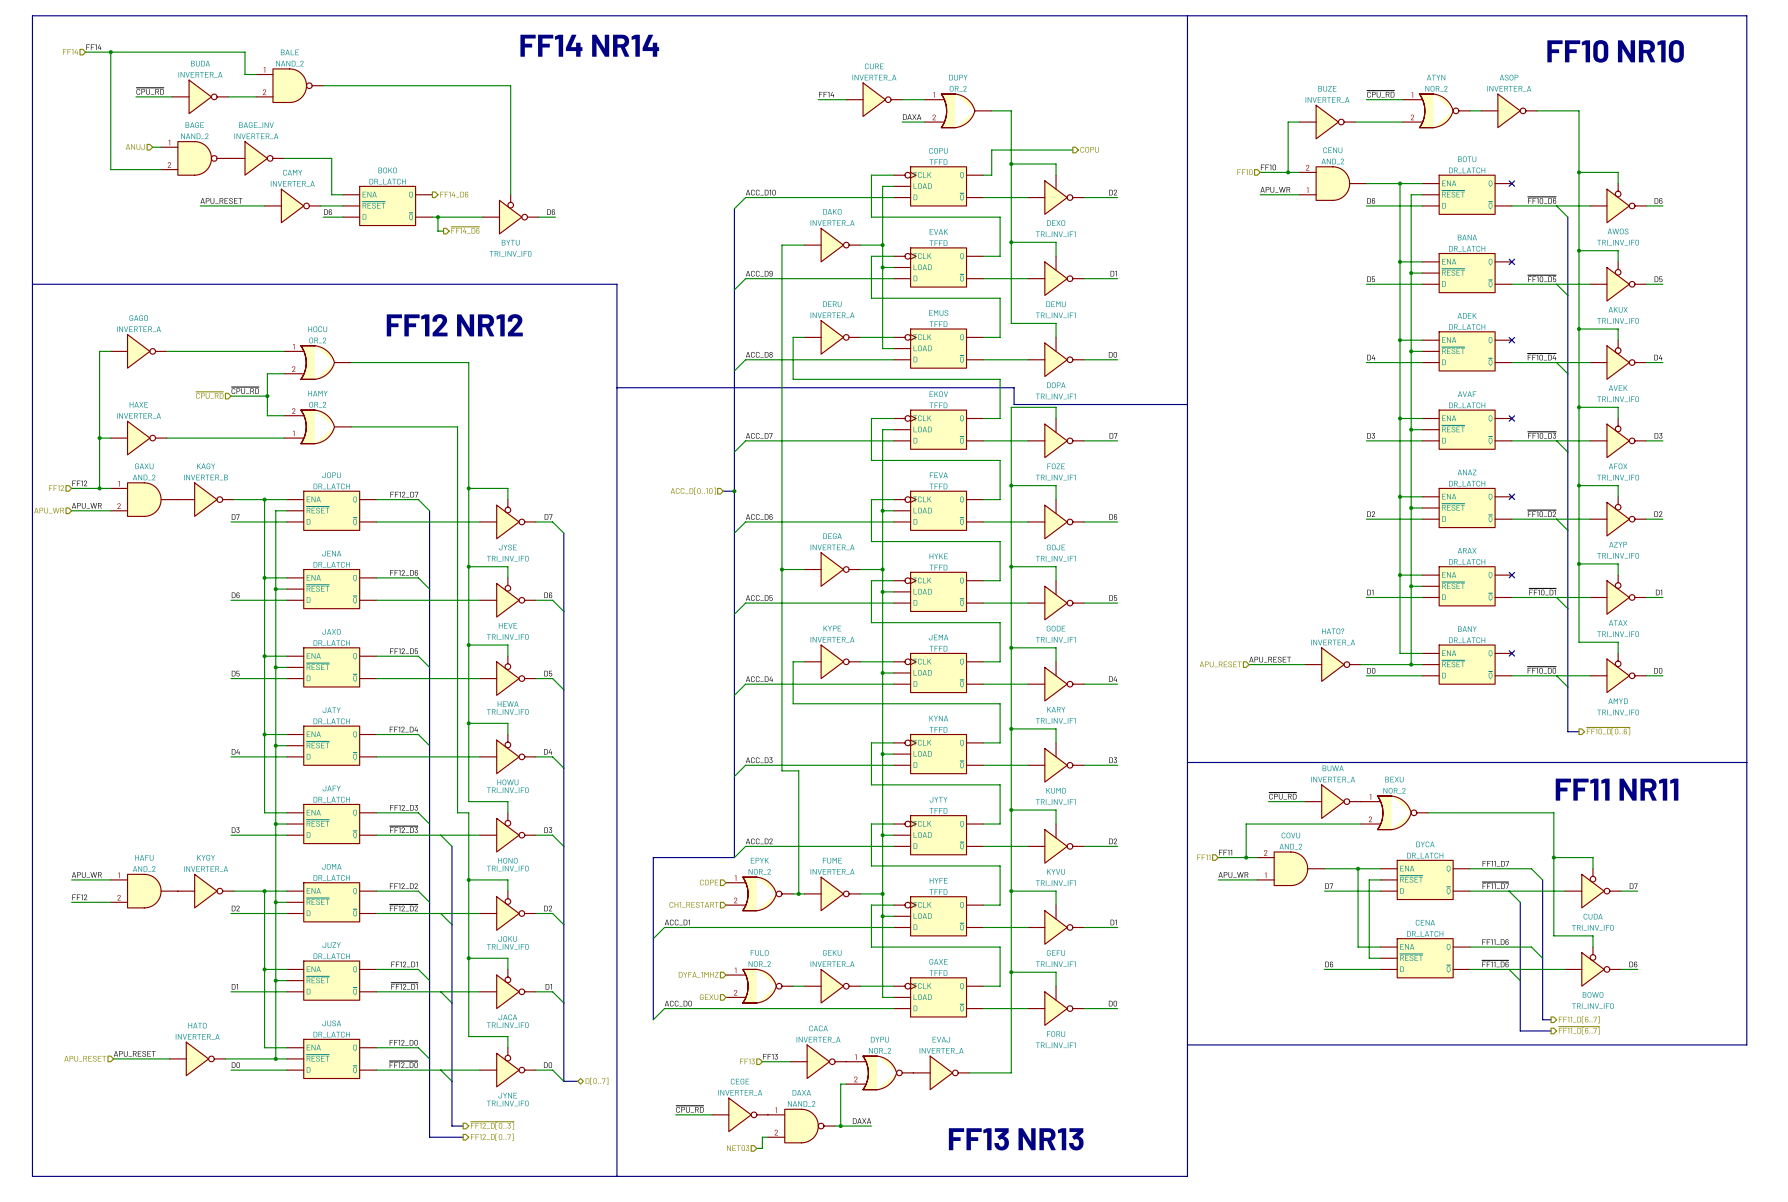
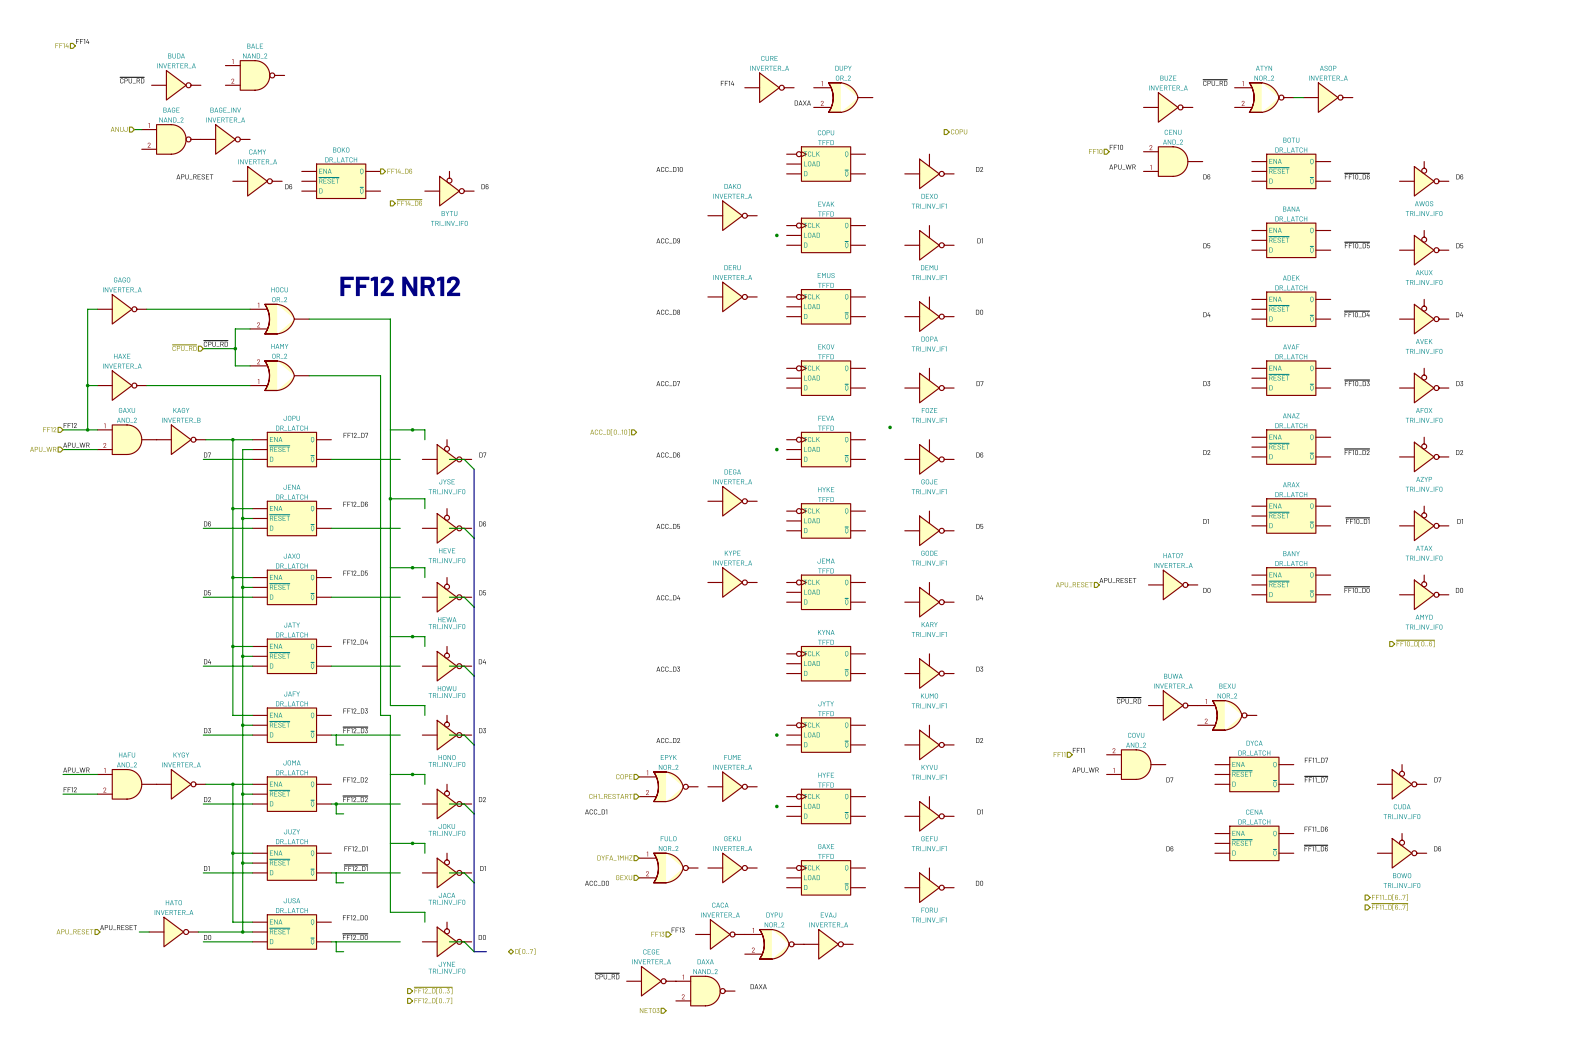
line: (1187, 15) (1187, 1176) (32, 1176) (32, 284) -> none
text: FF14 NR14 (589, 45) -> none
text: FF10 NR10 (1615, 51) -> none
wire: (85, 52) (245, 52) (245, 74) (256, 74) -> none
wire: (110, 52) (110, 169) (161, 169) -> none
junction: (110, 52) -> none
wire: (323, 85) (510, 85) (510, 194) -> none
wire: (135, 96) (172, 96) -> none
wire: (228, 96) (256, 96) -> none
wire: (818, 99) (846, 99) -> none
wire: (902, 99) (924, 99) -> none
wire: (1366, 99) (1402, 99) -> none
wire: (991, 110) (1011, 110) (1011, 323) (1056, 323) (1056, 337) -> none
wire: (1537, 110) (1578, 110) (1578, 642) (1618, 642) (1618, 653) -> none
wire: (902, 122) (924, 122) -> none
wire: (1299, 122) (1288, 122) (1288, 172) -> none
wire: (1355, 122) (1402, 122) -> none
wire: (1072, 150) (991, 150) (991, 175) (983, 175) -> none
wire: (284, 158) (331, 158) (331, 194) (342, 194) -> none
wire: (1011, 164) (1056, 164) (1056, 175) -> none
junction: (1011, 164) -> none
wire: (1260, 172) (1299, 172) -> none
junction: (1288, 172) -> none
wire: (1578, 172) (1618, 172) (1618, 183) -> none
junction: (1578, 172) -> none
wire: (893, 175) (871, 175) (871, 217) (1000, 217) (1000, 256) (983, 256) -> none
wire: (1366, 183) (1422, 183) -> none
wire: (1400, 183) (1400, 653) (1422, 653) -> none
junction: (1400, 183) -> none
no-connect mark: (1511, 183) -> none
wire: (893, 186) (882, 186) (882, 348) (893, 348) -> none
wire: (1260, 194) (1299, 194) -> none
wire: (1422, 194) (1411, 194) (1411, 664) -> none
wire: (893, 197) (745, 197) (734, 208) -> none
wire: (983, 197) (1028, 197) -> none
wire: (1083, 197) (1117, 197) -> none
wire: (200, 205) (264, 205) -> none
wire: (320, 205) (342, 205) -> none
wire: (1366, 205) (1422, 205) -> none
wire: (1511, 205) (1590, 205) -> none
wire: (1556, 205) (1567, 217) -> none
wire: (1646, 205) (1662, 205) -> none
bus: (734, 208) (734, 857) (653, 857) (653, 1019) -> none
wire: (323, 217) (342, 217) -> none
wire: (432, 217) (482, 217) -> none
wire: (437, 217) (437, 231) (443, 231) -> none
junction: (437, 217) -> none
wire: (538, 217) (555, 217) -> none
bus: (1567, 217) (1567, 731) (1578, 731) -> none
wire: (1011, 242) (1056, 242) (1056, 256) -> none
junction: (1011, 242) -> none
wire: (804, 245) (781, 245) (781, 770) (798, 770) (798, 893) -> none
wire: (860, 245) (882, 245) -> none
junction: (882, 245) -> none
wire: (1578, 250) (1618, 250) (1618, 261) -> none
junction: (1578, 250) -> none
wire: (893, 256) (871, 256) (871, 298) (1000, 298) (1000, 337) (983, 337) -> none
wire: (1400, 261) (1422, 261) -> none
junction: (1400, 261) -> none
no-connect mark: (1511, 261) -> none
wire: (882, 267) (893, 267) -> none
wire: (1411, 273) (1422, 273) -> none
junction: (1411, 273) -> none
wire: (893, 278) (745, 278) (734, 289) -> none
wire: (983, 278) (1028, 278) -> none
wire: (1083, 278) (1117, 278) -> none
line: (32, 284) (32, 15) (1746, 15) (1746, 1044) (1187, 1044) -> none
line: (32, 284) (616, 284) (616, 1176) -> none
wire: (1366, 284) (1422, 284) -> none
wire: (1511, 284) (1590, 284) -> none
wire: (1556, 284) (1567, 295) -> none
wire: (1646, 284) (1662, 284) -> none
wire: (1578, 329) (1618, 329) (1618, 340) -> none
junction: (1578, 329) -> none
wire: (804, 337) (793, 337) (793, 379) (1000, 379) (1000, 418) (983, 418) -> none
wire: (860, 337) (893, 337) -> none
wire: (1400, 340) (1422, 340) -> none
junction: (1400, 340) -> none
no-connect mark: (1511, 340) -> none
wire: (1411, 351) (1422, 351) -> none
junction: (1411, 351) -> none
wire: (893, 359) (745, 359) (734, 370) -> none
wire: (983, 359) (1028, 359) -> none
wire: (1083, 359) (1117, 359) -> none
wire: (443, 362) (468, 362) (468, 801) -> (390, 319) (390, 705) (412, 705)
wire: (1366, 362) (1422, 362) -> none
wire: (1511, 362) (1590, 362) -> none
wire: (1556, 362) (1567, 373) -> none
wire: (1646, 362) (1662, 362) -> none
line: (616, 387) (1014, 387) (1014, 404) (1187, 404) -> none
wire: (1578, 407) (1618, 407) (1618, 418) -> none
junction: (1578, 407) -> none
wire: (893, 418) (871, 418) (871, 460) (1000, 460) (1000, 499) (983, 499) -> none
wire: (1056, 418) (1056, 407) (1011, 407) (1011, 1072) (969, 1072) -> none
wire: (1400, 418) (1422, 418) -> none
junction: (1400, 418) -> none
no-connect mark: (1511, 418) -> none
wire: (432, 426) (457, 426) (457, 812) (468, 812) (468, 1036) -> (380, 375) (380, 715) (390, 715) (390, 912) (412, 912)
wire: (893, 429) (882, 429) (882, 997) (893, 997) -> none
wire: (1411, 429) (1422, 429) -> none
junction: (1411, 429) -> none
wire: (893, 440) (745, 440) (734, 452) -> none
wire: (983, 440) (1028, 440) -> none
wire: (1083, 440) (1117, 440) -> none
wire: (1366, 440) (1422, 440) -> none
wire: (1511, 440) (1590, 440) -> none
wire: (1556, 440) (1567, 452) -> none
wire: (1646, 440) (1662, 440) -> none
wire: (1011, 485) (1056, 485) (1056, 499) -> none
wire: (1578, 485) (1618, 485) (1618, 496) -> none
junction: (1578, 485) -> none
wire: (482, 488) (507, 488) (507, 499) -> (424, 429) (424, 439)
bus: (723, 491) (734, 491) -> none
junction: (734, 491) -> none
wire: (1400, 496) (1422, 496) -> none
junction: (1400, 496) -> none
no-connect mark: (1511, 496) -> none
wire: (376, 499) (418, 499) (429, 510) -> none
wire: (893, 499) (871, 499) (871, 541) (1000, 541) (1000, 580) (983, 580) -> none
wire: (1411, 507) (1422, 507) -> none
junction: (1411, 507) -> none
bus: (429, 510) (429, 1137) (463, 1137) -> none
wire: (882, 510) (893, 510) -> none
wire: (1366, 519) (1422, 519) -> none
wire: (1511, 519) (1590, 519) -> none
wire: (1556, 519) (1567, 530) -> none
wire: (1646, 519) (1662, 519) -> none
wire: (454, 521) (479, 521) -> (390, 429) (412, 429)
wire: (535, 521) (552, 521) (563, 533) -> (449, 459) (464, 459) (474, 469)
wire: (893, 521) (745, 521) (734, 533) -> none
wire: (983, 521) (1028, 521) -> none
wire: (1083, 521) (1117, 521) -> none
bus: (563, 533) (563, 1081) (577, 1081) -> (474, 469) (474, 951) (486, 951)
wire: (1578, 563) (1618, 563) (1618, 575) -> none
junction: (1578, 563) -> none
junction position: (468, 566) -> (390, 498)
wire: (482, 566) (507, 566) (507, 577) -> (424, 498) (424, 508)
wire: (1011, 566) (1056, 566) (1056, 580) -> none
junction: (1011, 566) -> none
wire: (781, 569) (804, 569) -> none
junction: (781, 569) -> none
wire: (860, 569) (882, 569) -> none
junction: (882, 569) -> none
wire: (1400, 575) (1422, 575) -> none
junction: (1400, 575) -> none
no-connect mark: (1511, 575) -> none
wire: (376, 577) (418, 577) (429, 589) -> none
wire: (893, 580) (871, 580) (871, 622) (1000, 622) (1000, 661) (983, 661) -> none
wire: (1411, 586) (1422, 586) -> none
junction: (1411, 586) -> none
wire: (882, 591) (893, 591) -> none
junction: (882, 591) -> none
wire: (1366, 597) (1422, 597) -> none
wire: (1511, 597) (1590, 597) -> none
wire: (1556, 597) (1567, 608) -> none
wire: (1646, 597) (1662, 597) -> none
wire: (454, 600) (479, 600) -> (390, 498) (412, 498)
wire: (535, 600) (552, 600) (563, 611) -> (449, 528) (464, 528) (474, 538)
wire: (893, 603) (745, 603) (734, 614) -> none
wire: (983, 603) (1028, 603) -> none
wire: (1083, 603) (1117, 603) -> none
wire: (482, 645) (507, 645) (507, 656) -> (424, 567) (424, 577)
wire: (1011, 647) (1056, 647) (1056, 661) -> none
junction: (1011, 647) -> none
no-connect mark: (1511, 653) -> none
wire: (376, 656) (418, 656) (429, 667) -> none
wire: (804, 661) (793, 661) (793, 703) (1000, 703) (1000, 742) (983, 742) -> none
wire: (860, 661) (893, 661) -> none
wire: (1248, 664) (1304, 664) -> none
wire: (1360, 664) (1422, 664) -> none
junction: (1411, 664) -> none
wire: (882, 672) (893, 672) -> none
junction: (882, 672) -> none
wire: (1366, 675) (1422, 675) -> none
wire: (1511, 675) (1590, 675) -> none
wire: (1556, 675) (1567, 686) -> none
wire: (1646, 675) (1662, 675) -> none
wire: (454, 678) (479, 678) -> (390, 567) (412, 567)
wire: (535, 678) (552, 678) (563, 689) -> (449, 597) (464, 597) (474, 607)
wire: (893, 684) (745, 684) (734, 695) -> none
wire: (983, 684) (1028, 684) -> none
wire: (1083, 684) (1117, 684) -> none
wire: (482, 723) (507, 723) (507, 734) -> (424, 636) (424, 646)
wire: (1011, 728) (1056, 728) (1056, 742) -> none
junction: (1011, 728) -> none
wire: (376, 734) (418, 734) (429, 745) -> none
wire: (893, 742) (871, 742) (871, 784) (1000, 784) (1000, 824) (983, 824) -> none
wire: (882, 754) (893, 754) -> none
junction: (882, 754) -> none
wire: (454, 756) (479, 756) -> (390, 636) (412, 636)
wire: (535, 756) (552, 756) (563, 768) -> (449, 666) (464, 666) (474, 676)
line: (1187, 762) (1746, 762) -> none
wire: (893, 765) (745, 765) (734, 776) -> none
wire: (983, 765) (1028, 765) -> none
wire: (1083, 765) (1117, 765) -> none
text: FF11 NR11 (1617, 789) -> none
wire: (482, 801) (507, 801) (507, 812) -> (424, 705) (424, 715)
wire: (1268, 801) (1304, 801) -> none
wire: (1011, 810) (1056, 810) (1056, 824) -> none
junction: (1011, 810) -> none
wire: (376, 812) (418, 812) (429, 824) -> none
wire: (1427, 812) (1553, 812) (1553, 935) (1592, 935) (1592, 947) -> none
wire: (893, 824) (871, 824) (871, 865) (1000, 865) (1000, 905) (983, 905) -> none
wire: (1360, 824) (1246, 824) (1246, 857) -> none
wire: none -> (336, 735) (336, 744) (343, 744)
wire: (440, 835) (451, 846) -> none
wire: (454, 835) (479, 835) -> none
wire: (535, 835) (552, 835) (563, 846) -> (449, 735) (464, 735) (474, 744)
wire: (882, 835) (893, 835) -> none
bus: (451, 846) (451, 1126) (463, 1126) -> none
wire: (893, 846) (745, 846) (734, 857) -> none
wire: (983, 846) (1028, 846) -> none
wire: (1083, 846) (1117, 846) -> none
wire: (1218, 857) (1257, 857) -> none
junction: (1246, 857) -> none
wire: (1553, 857) (1592, 857) (1592, 868) -> none
junction: (1553, 857) -> none
wire: (1324, 868) (1380, 868) -> none
wire: (1358, 868) (1358, 947) (1380, 947) -> none
junction: (1358, 868) -> none
wire: (1469, 868) (1531, 868) (1542, 879) -> none
wire: (482, 879) (507, 879) (507, 891) -> (424, 774) (424, 784)
wire: (1218, 879) (1257, 879) -> none
wire: (1380, 879) (1369, 879) (1369, 958) (1380, 958) -> none
bus: (1542, 879) (1542, 1019) (1551, 1019) -> none
wire: (376, 891) (418, 891) (429, 902) -> none
wire: (1011, 891) (1056, 891) (1056, 905) -> none
junction: (1011, 891) -> none
wire: (1324, 891) (1380, 891) -> none
wire: (1469, 891) (1565, 891) -> none
wire: (1509, 891) (1520, 902) -> none
wire: (1620, 891) (1637, 891) -> none
wire: (793, 893) (804, 893) -> none
junction: (798, 893) -> none
wire: (860, 893) (882, 893) -> none
junction: (882, 893) -> none
bus: (1520, 902) (1520, 1030) (1551, 1030) -> none
wire: (893, 905) (871, 905) (871, 947) (1000, 947) (1000, 986) (983, 986) -> none
wire: none -> (336, 804) (336, 813) (343, 813)
junction: none -> (336, 804)
wire: (440, 913) (451, 924) -> none
wire: (454, 913) (479, 913) -> (390, 774) (412, 774)
wire: (535, 913) (552, 913) (563, 924) -> (449, 804) (464, 804) (474, 813)
wire: (882, 916) (893, 916) -> none
wire: (893, 927) (664, 927) (653, 938) -> none
wire: (983, 927) (1028, 927) -> none
wire: (1083, 927) (1117, 927) -> none
wire: (1469, 947) (1531, 947) (1542, 958) -> none
wire: (482, 958) (507, 958) (507, 969) -> (424, 843) (424, 853)
wire: (376, 969) (418, 969) (429, 980) -> none
wire: (1324, 969) (1380, 969) -> none
wire: (1469, 969) (1565, 969) -> none
wire: (1509, 969) (1520, 980) -> none
wire: (1620, 969) (1637, 969) -> none
wire: (1011, 972) (1056, 972) (1056, 986) -> none
junction: (1011, 972) -> none
wire: (793, 986) (804, 986) -> none
wire: (860, 986) (893, 986) -> none
wire: none -> (336, 872) (336, 882) (343, 882)
wire: (440, 991) (451, 1003) -> none
wire: (454, 991) (479, 991) -> (390, 843) (412, 843)
wire: (535, 991) (552, 991) (563, 1003) -> (449, 872) (464, 872) (474, 882)
wire: (893, 1008) (664, 1008) (653, 1019) -> none
wire: (983, 1008) (1028, 1008) -> none
wire: (1083, 1008) (1117, 1008) -> none
wire: (482, 1036) (507, 1036) (507, 1047) -> (424, 912) (424, 922)
wire: (376, 1047) (418, 1047) (429, 1058) -> none
wire: (113, 1058) (158, 1058) -> none
wire: (762, 1061) (790, 1061) -> none
wire: none -> (336, 941) (336, 951) (343, 951)
wire: (440, 1070) (451, 1081) -> none
wire: (454, 1070) (479, 1070) -> none
wire: (535, 1070) (552, 1070) (563, 1081) -> (449, 941) (464, 941) (474, 951)
wire: (846, 1084) (840, 1084) (840, 1126) -> none
wire: (675, 1114) (712, 1114) -> none
wire: (835, 1126) (871, 1126) -> none
junction: (840, 1126) -> none
wire: (767, 1137) (762, 1137) (762, 1148) (756, 1148) -> none
text: FF13 NR13 (1016, 1139) -> none

